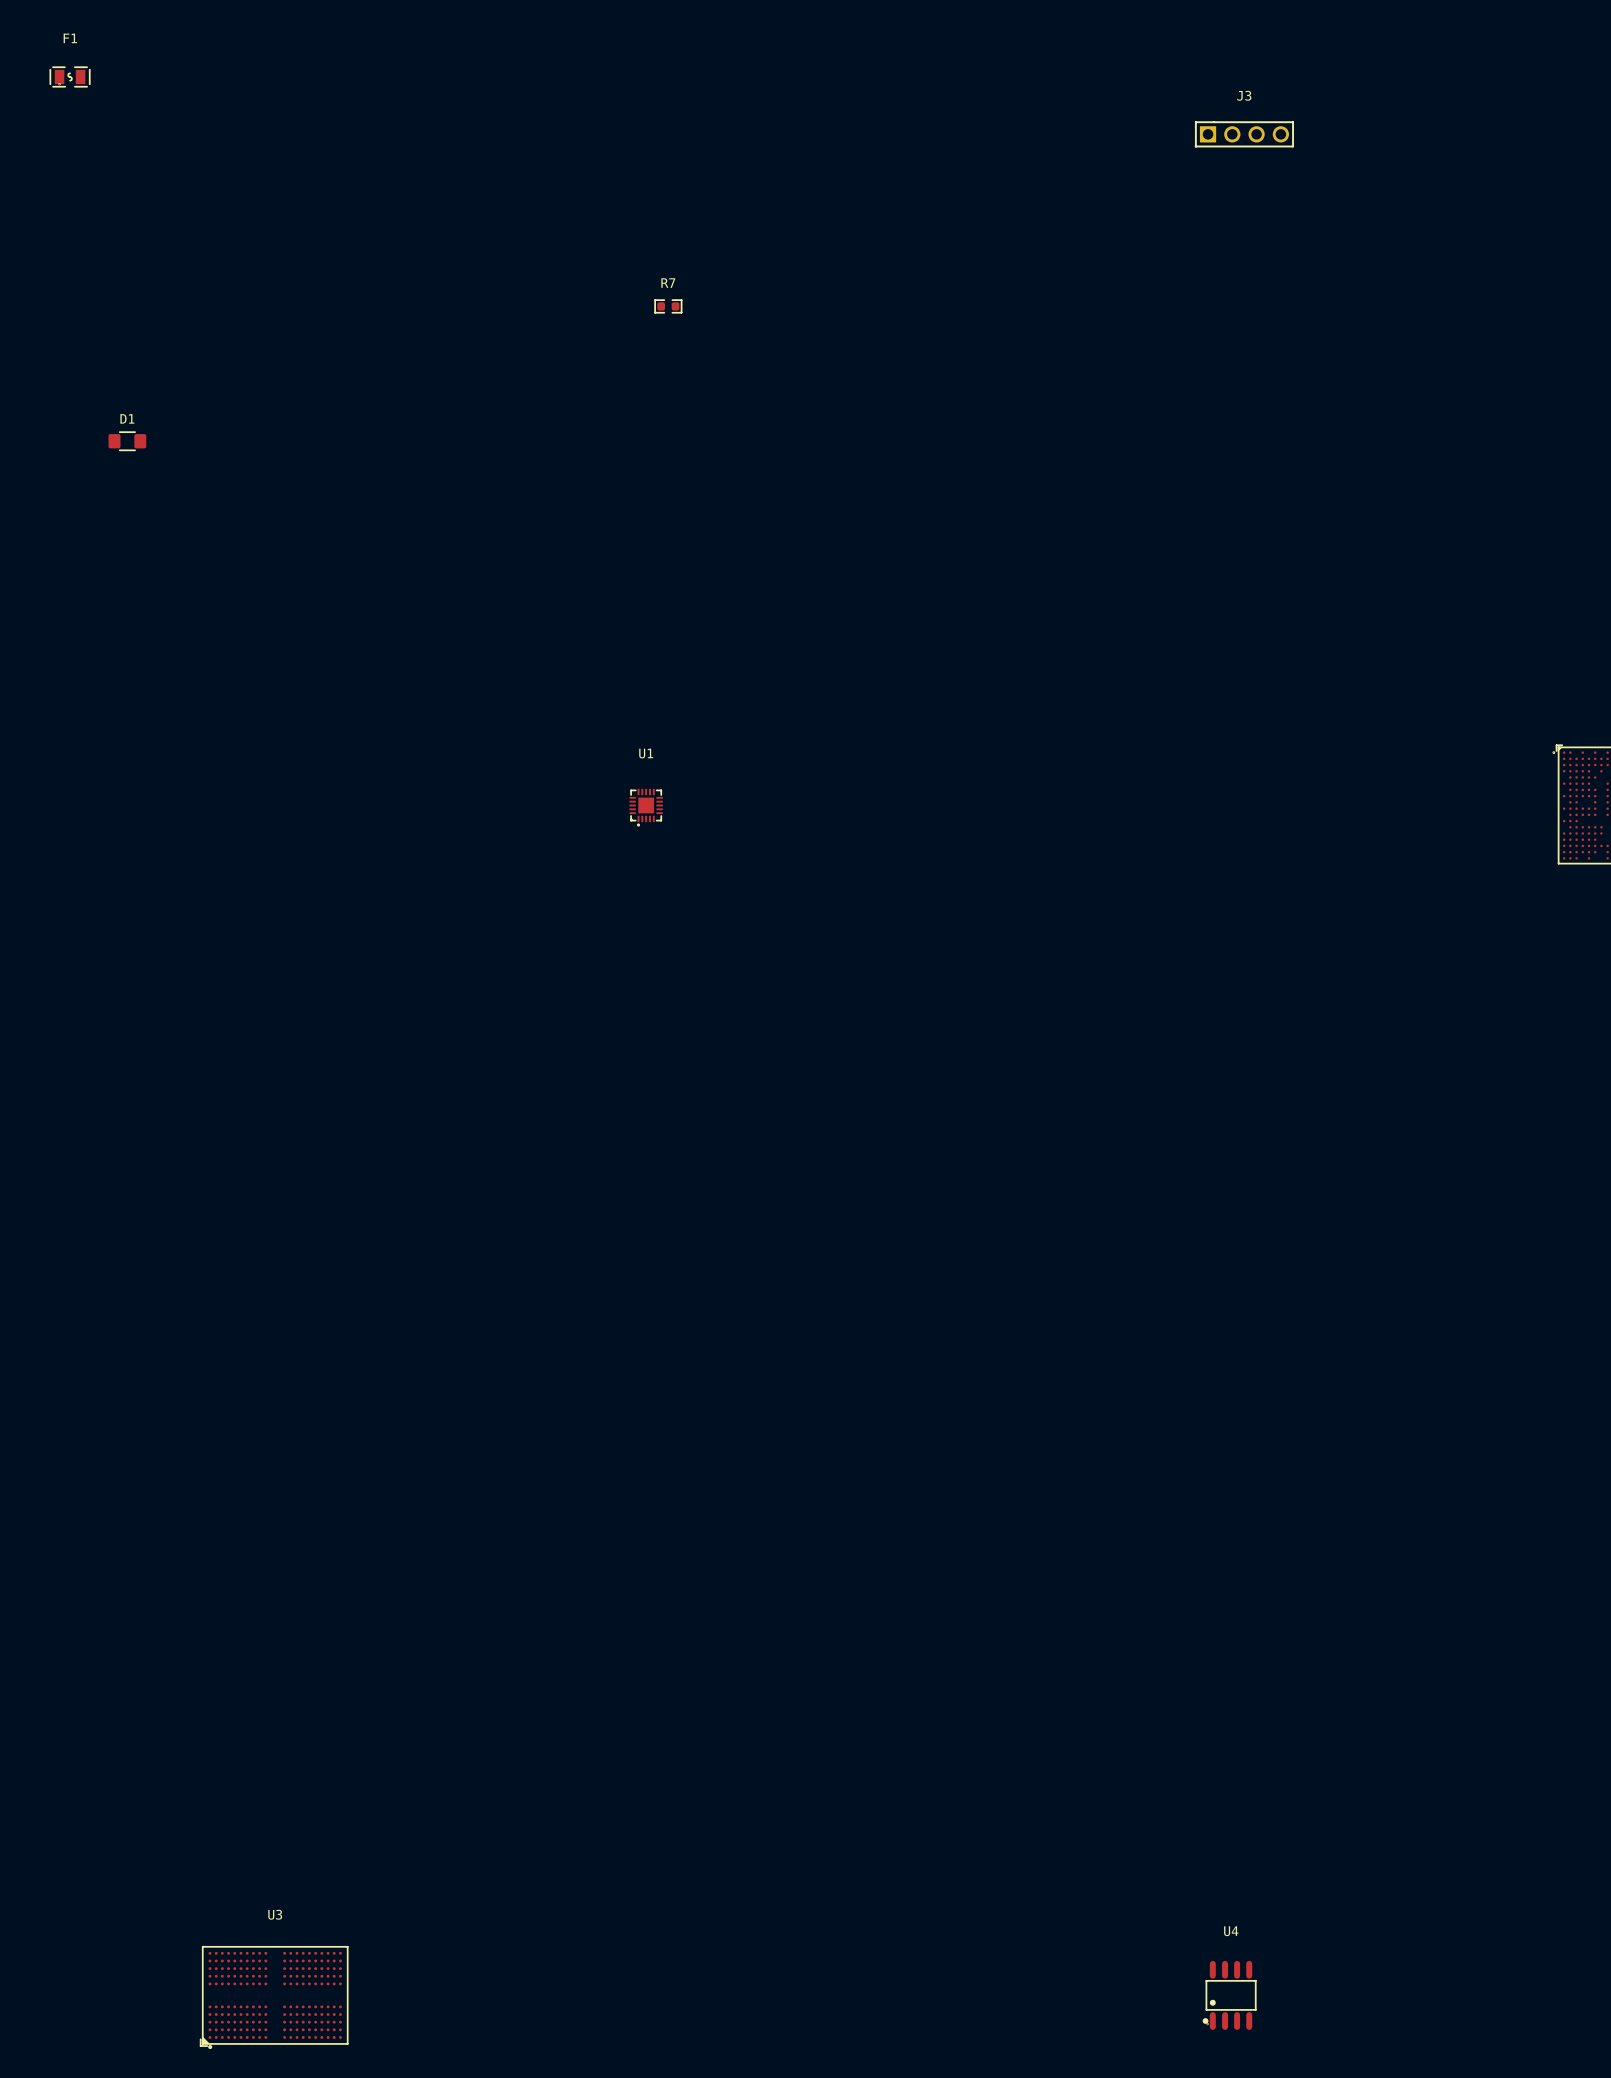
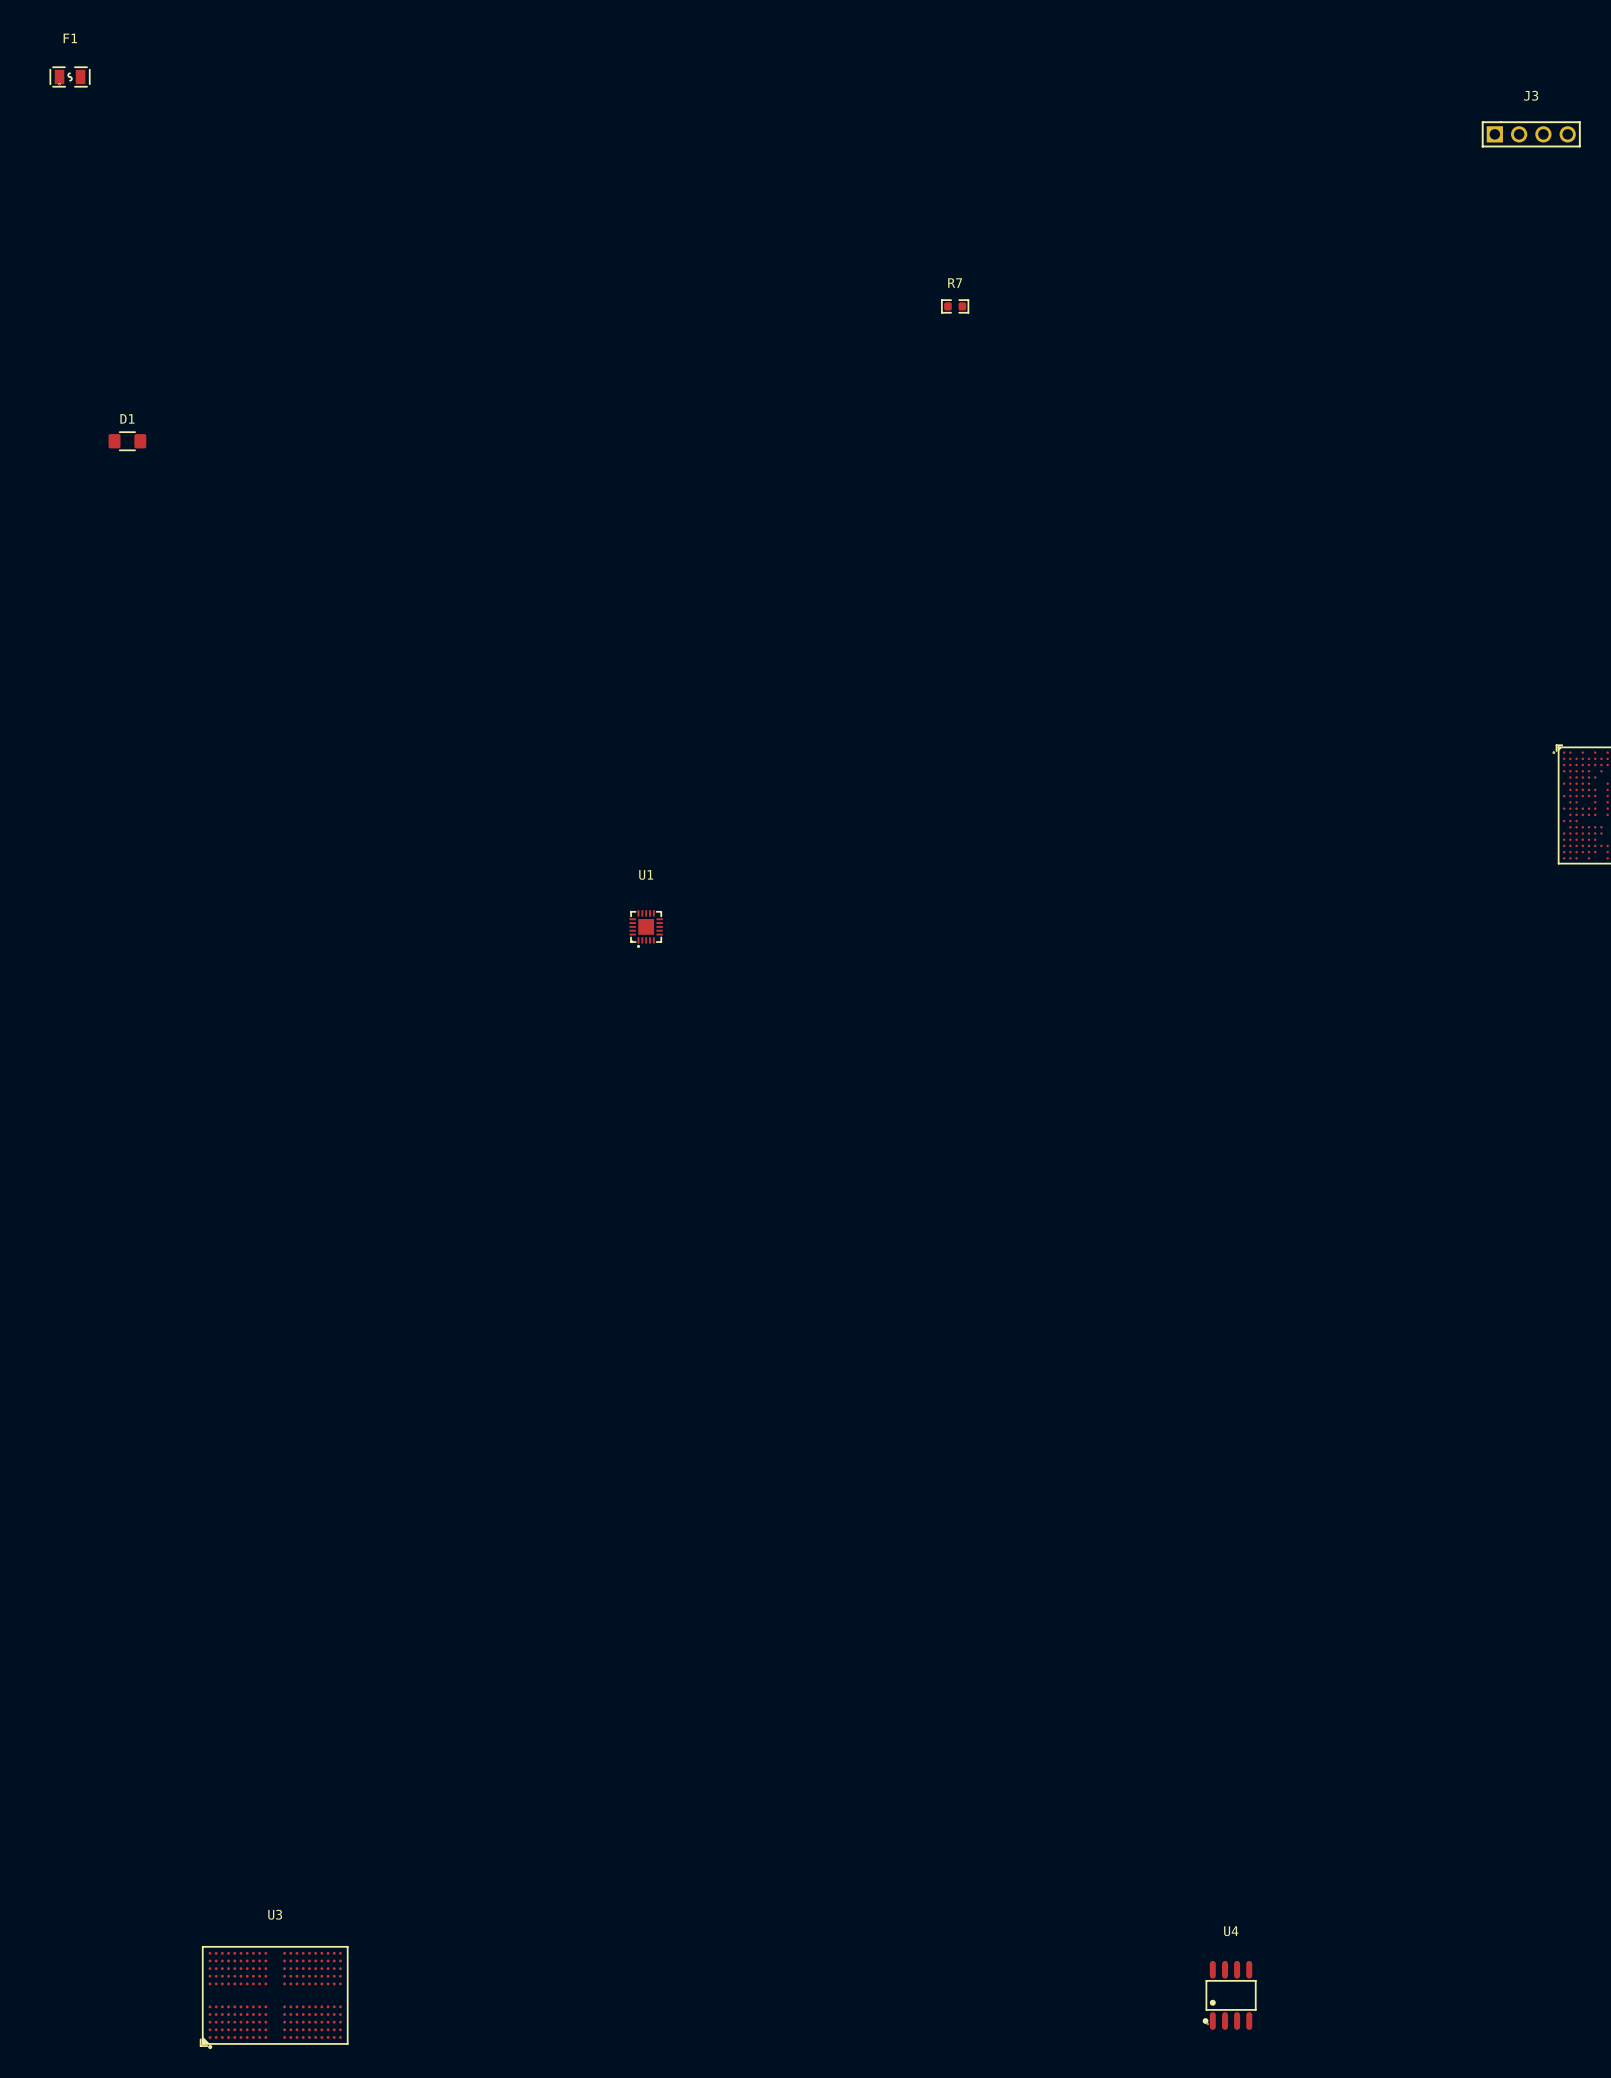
J3 position: (1244, 134) -> (1531, 134)
R7 position: (668, 306) -> (955, 306)
U1 position: (646, 807) -> (646, 929)

